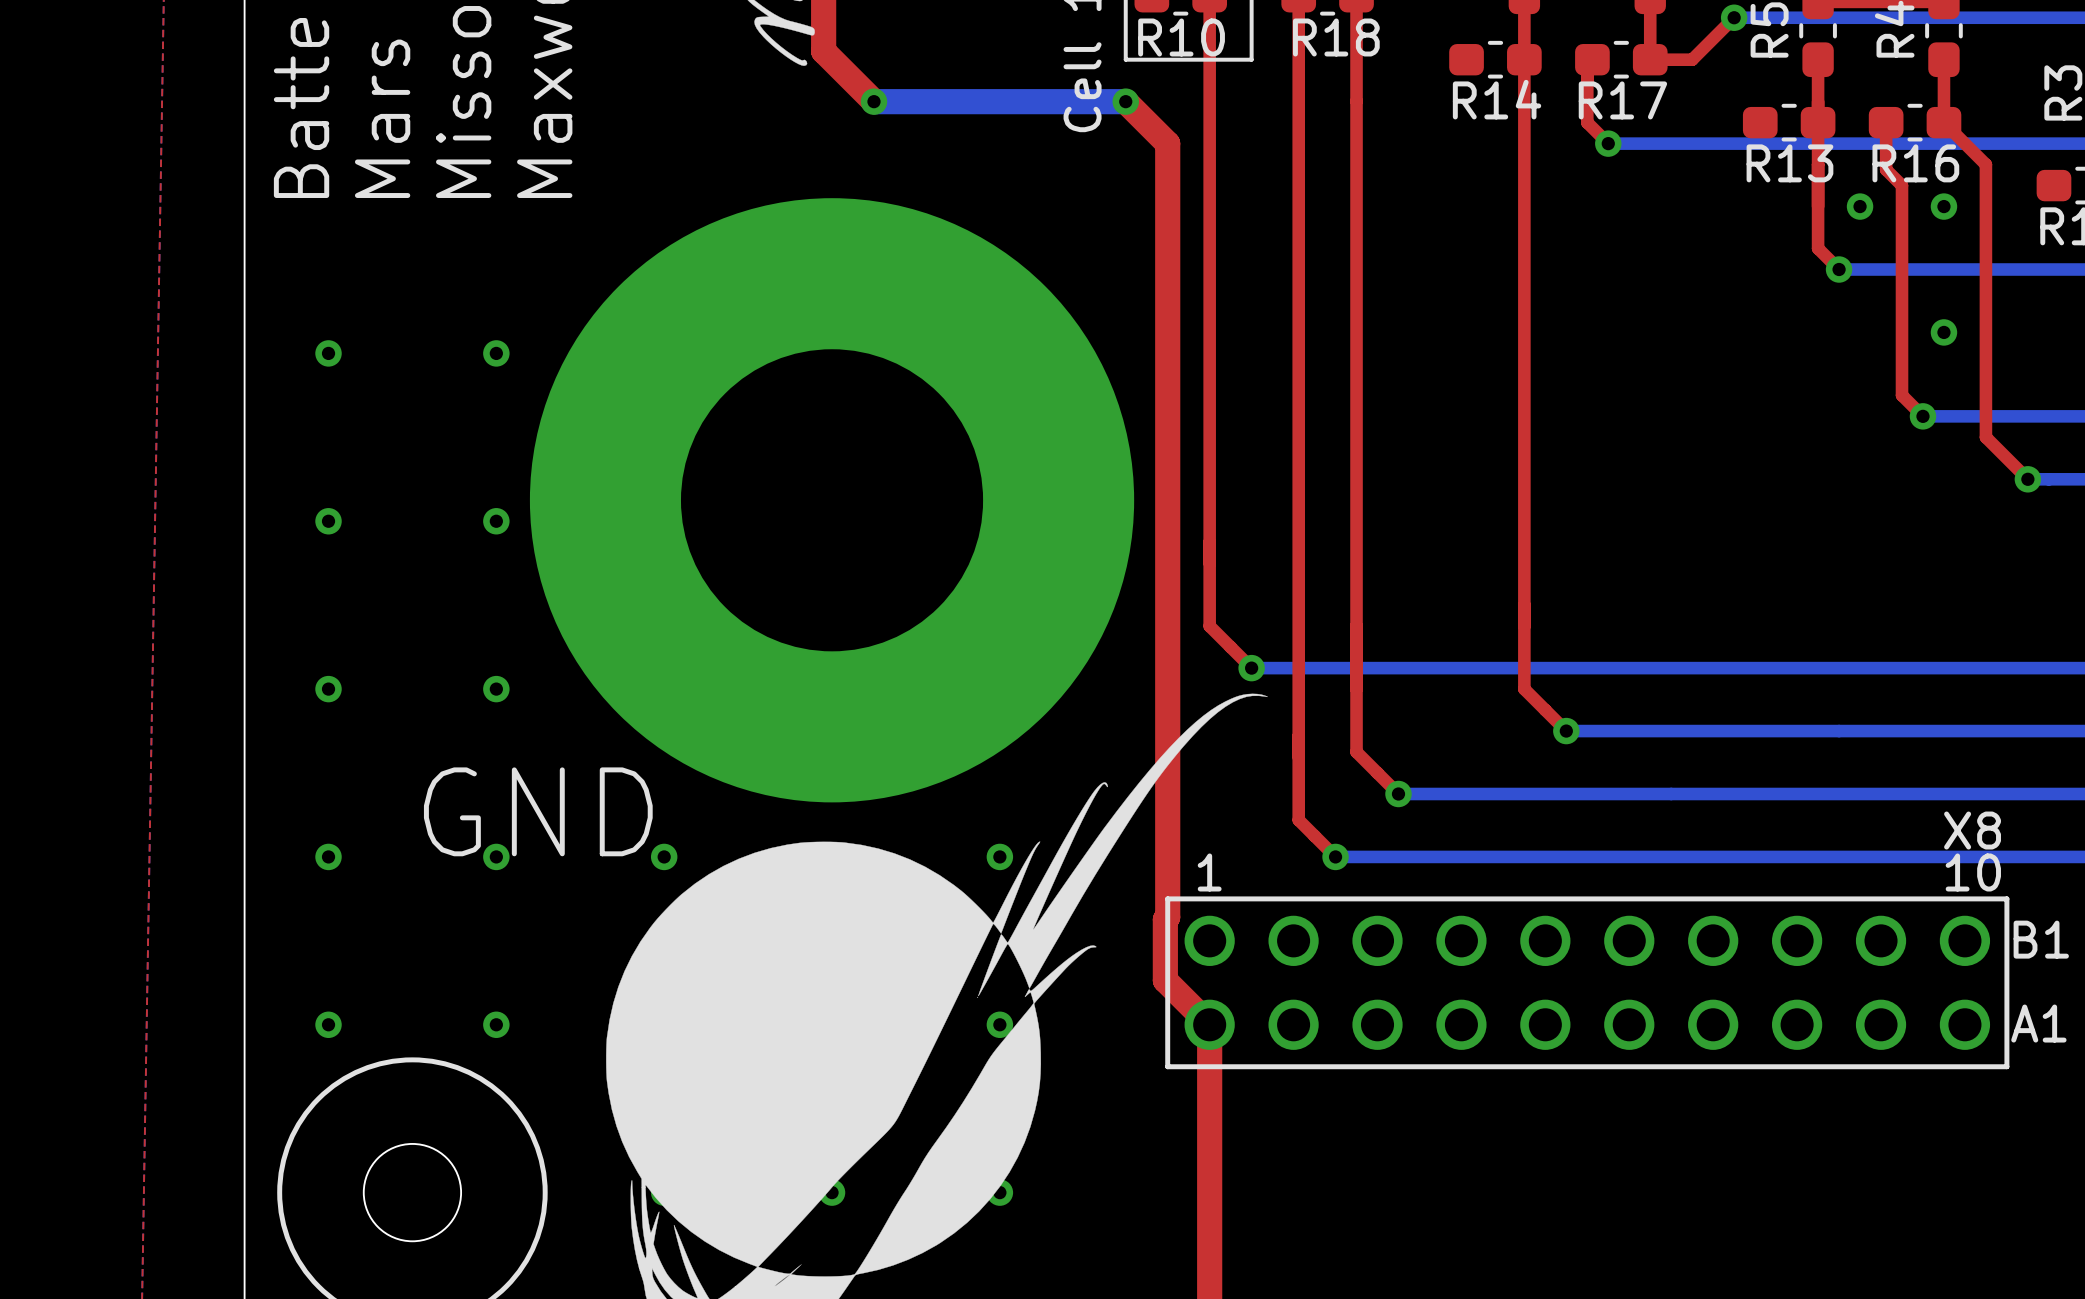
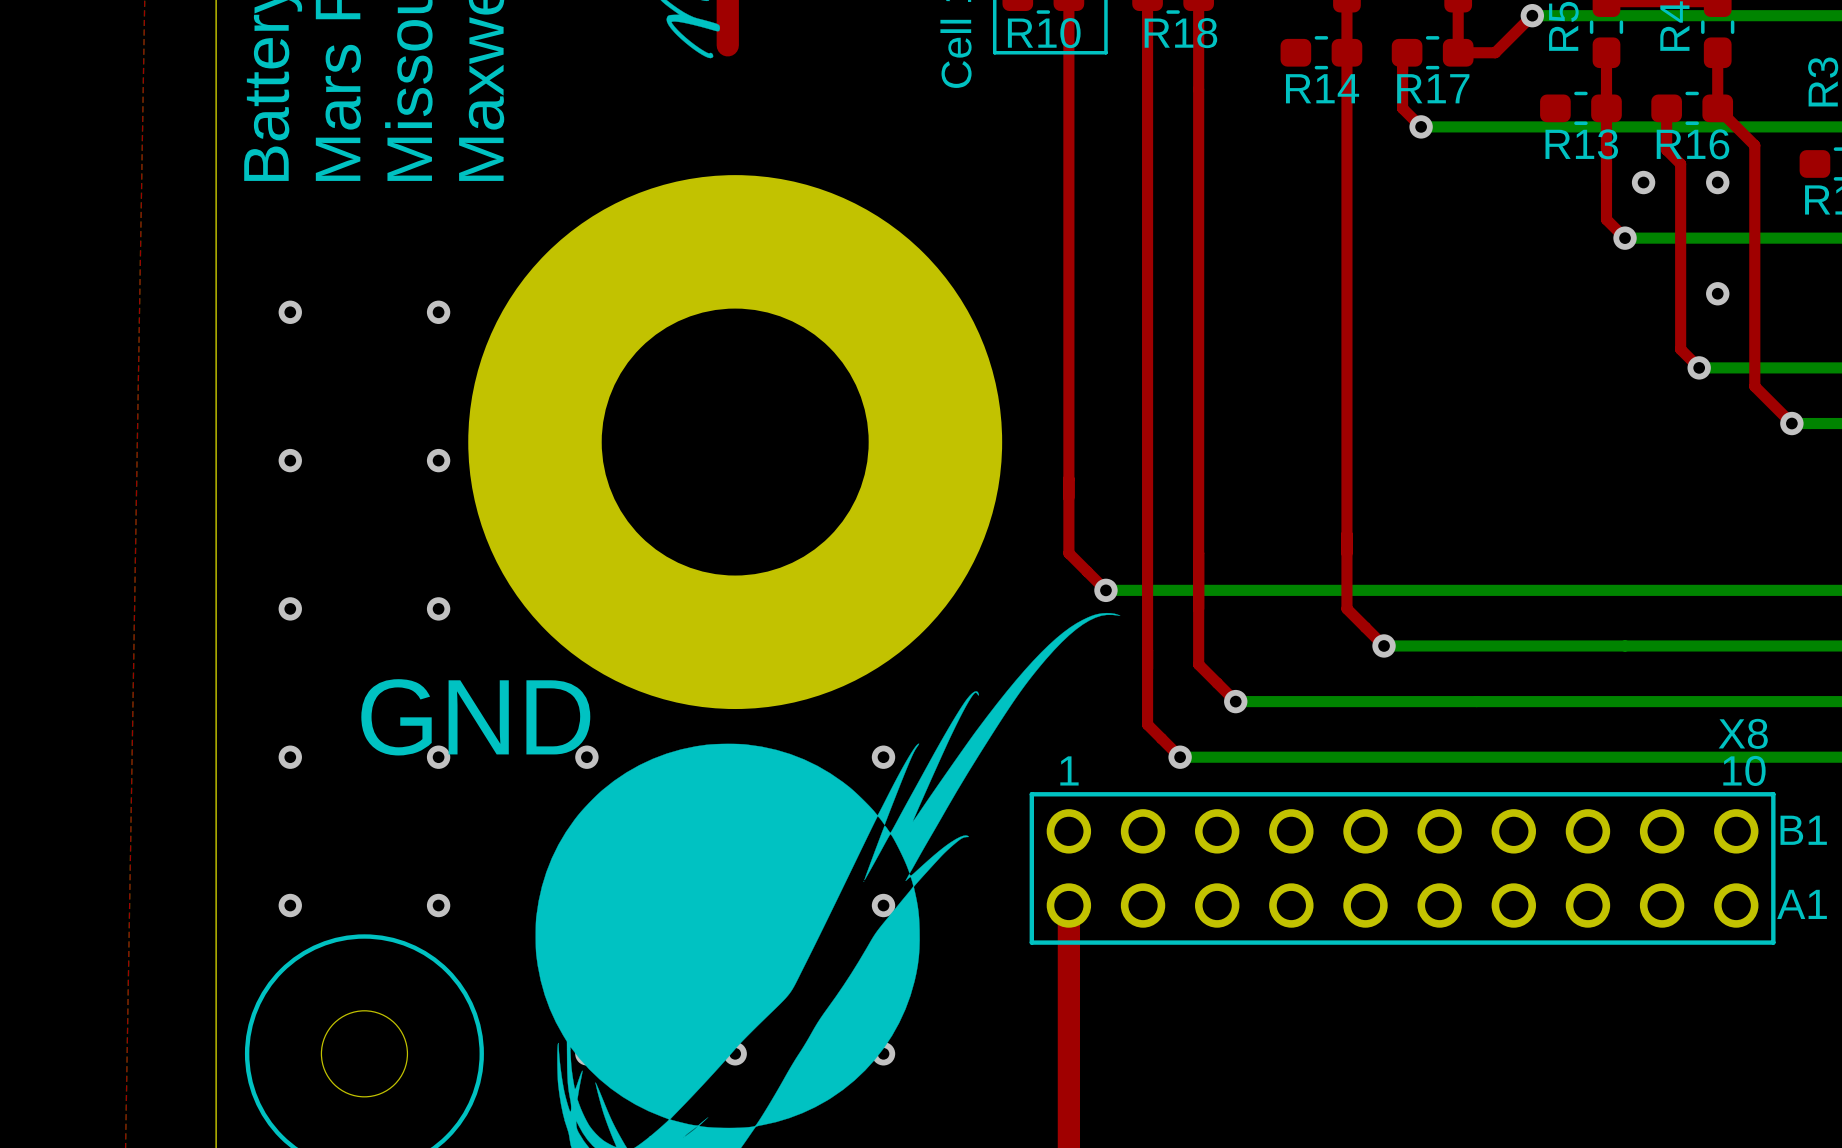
top track: (823, 51) (873, 101) -> none
bottom track: (873, 101) (1125, 101) -> none
via: (873, 101) -> none
top track: (1125, 101) (1167, 143) (1167, 917) (1165, 919) (1165, 980) (1209, 1024) -> none
via: (1125, 101) -> none

